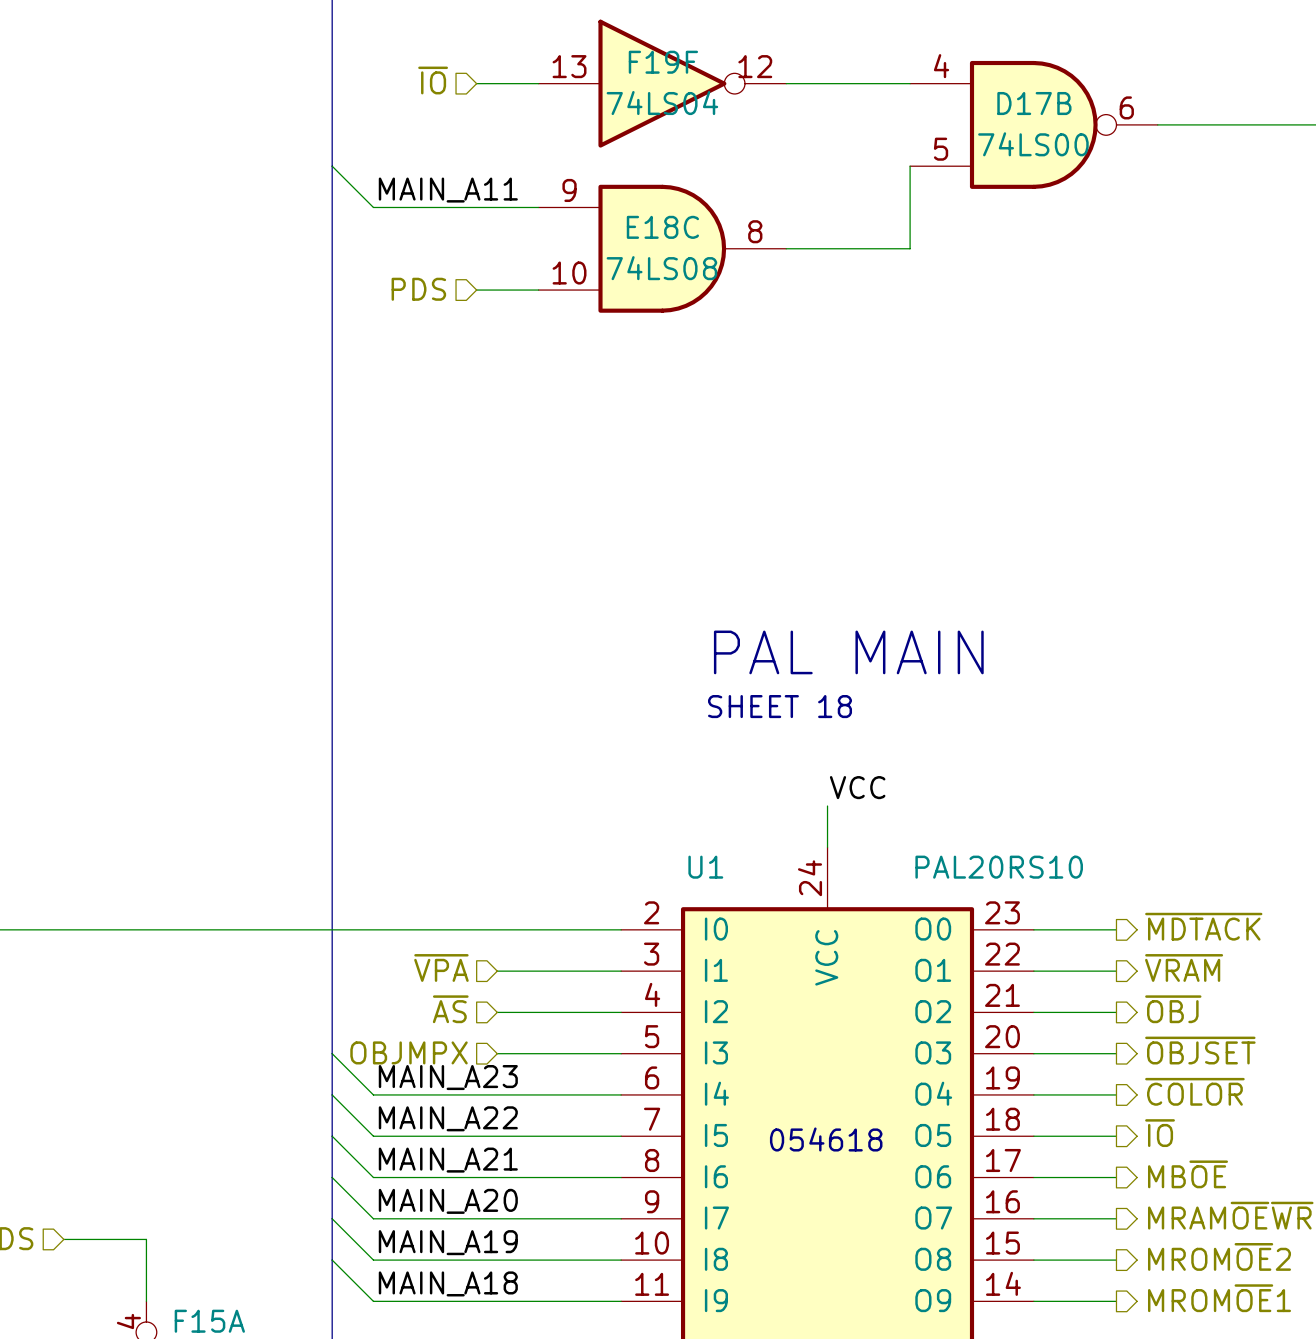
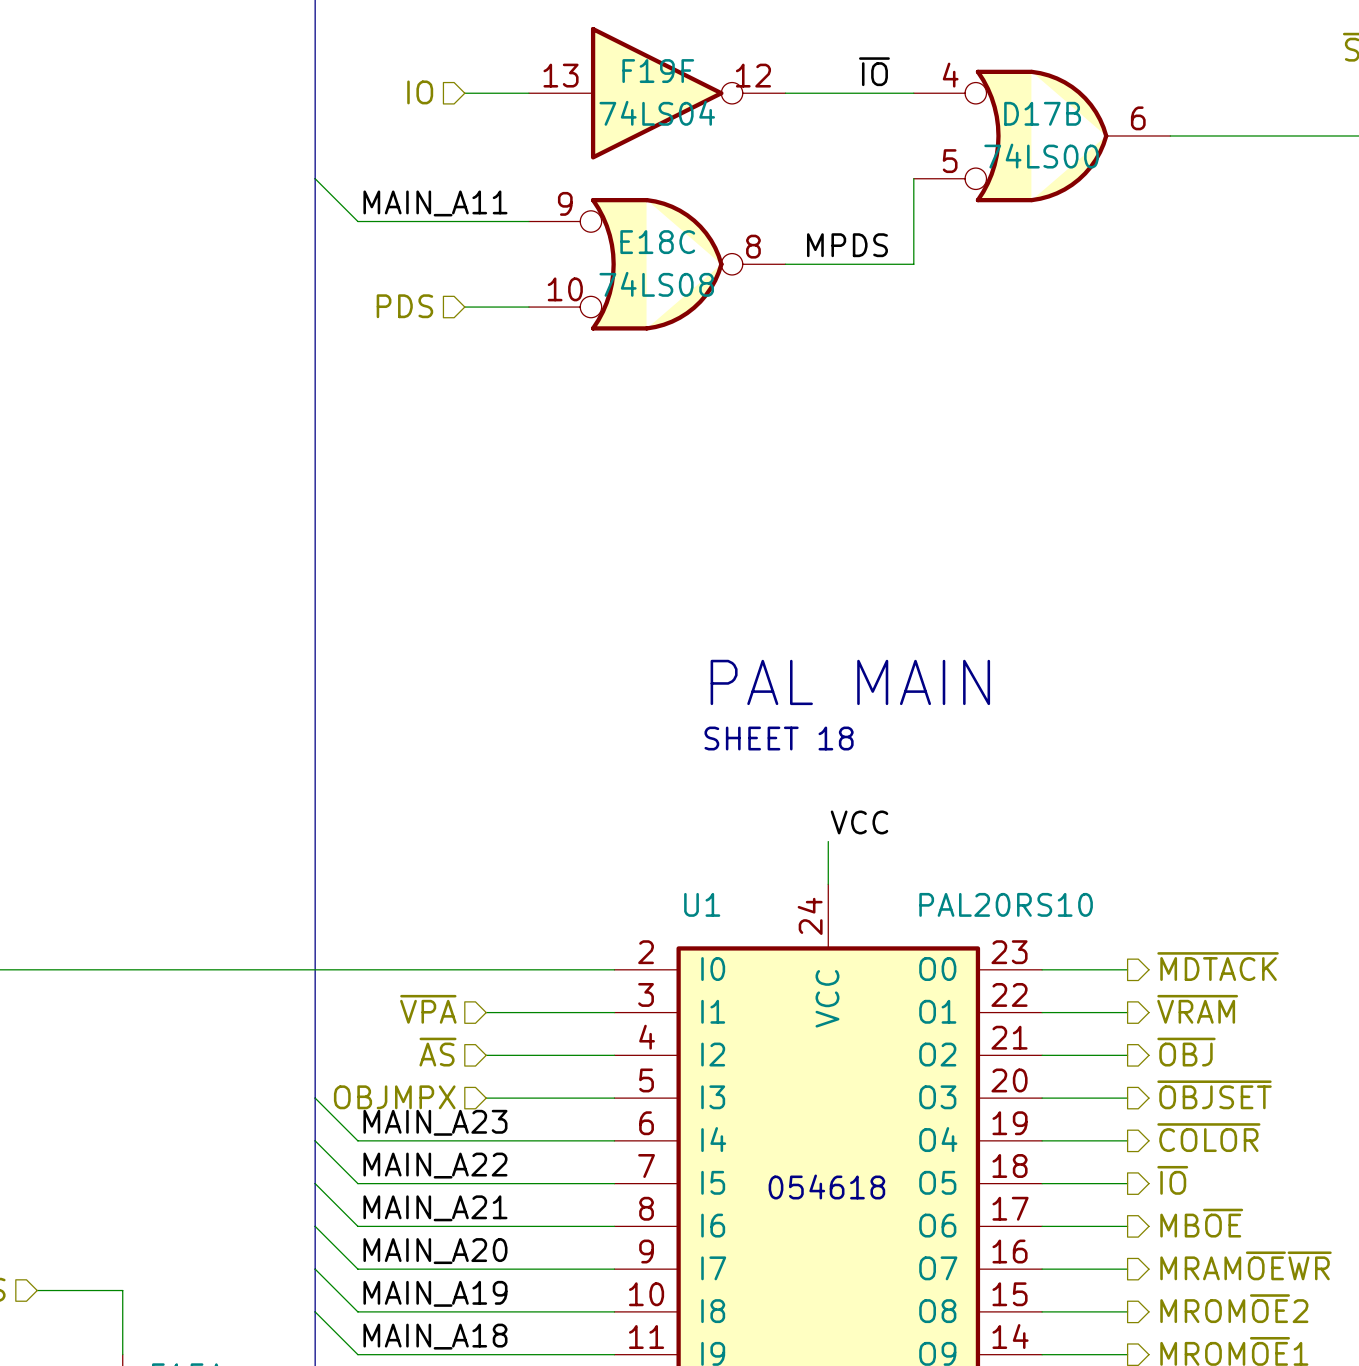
D17B symbol: [910, 60, 1158, 189] -> [913, 69, 1171, 203]
label: none -> ~{IO} (874, 71)
hierarchical label: ~{IO} (433, 80) -> IO (420, 92)
E18C symbol: [538, 184, 787, 313] -> [528, 198, 786, 331]
label: none -> MPDS (847, 245)

